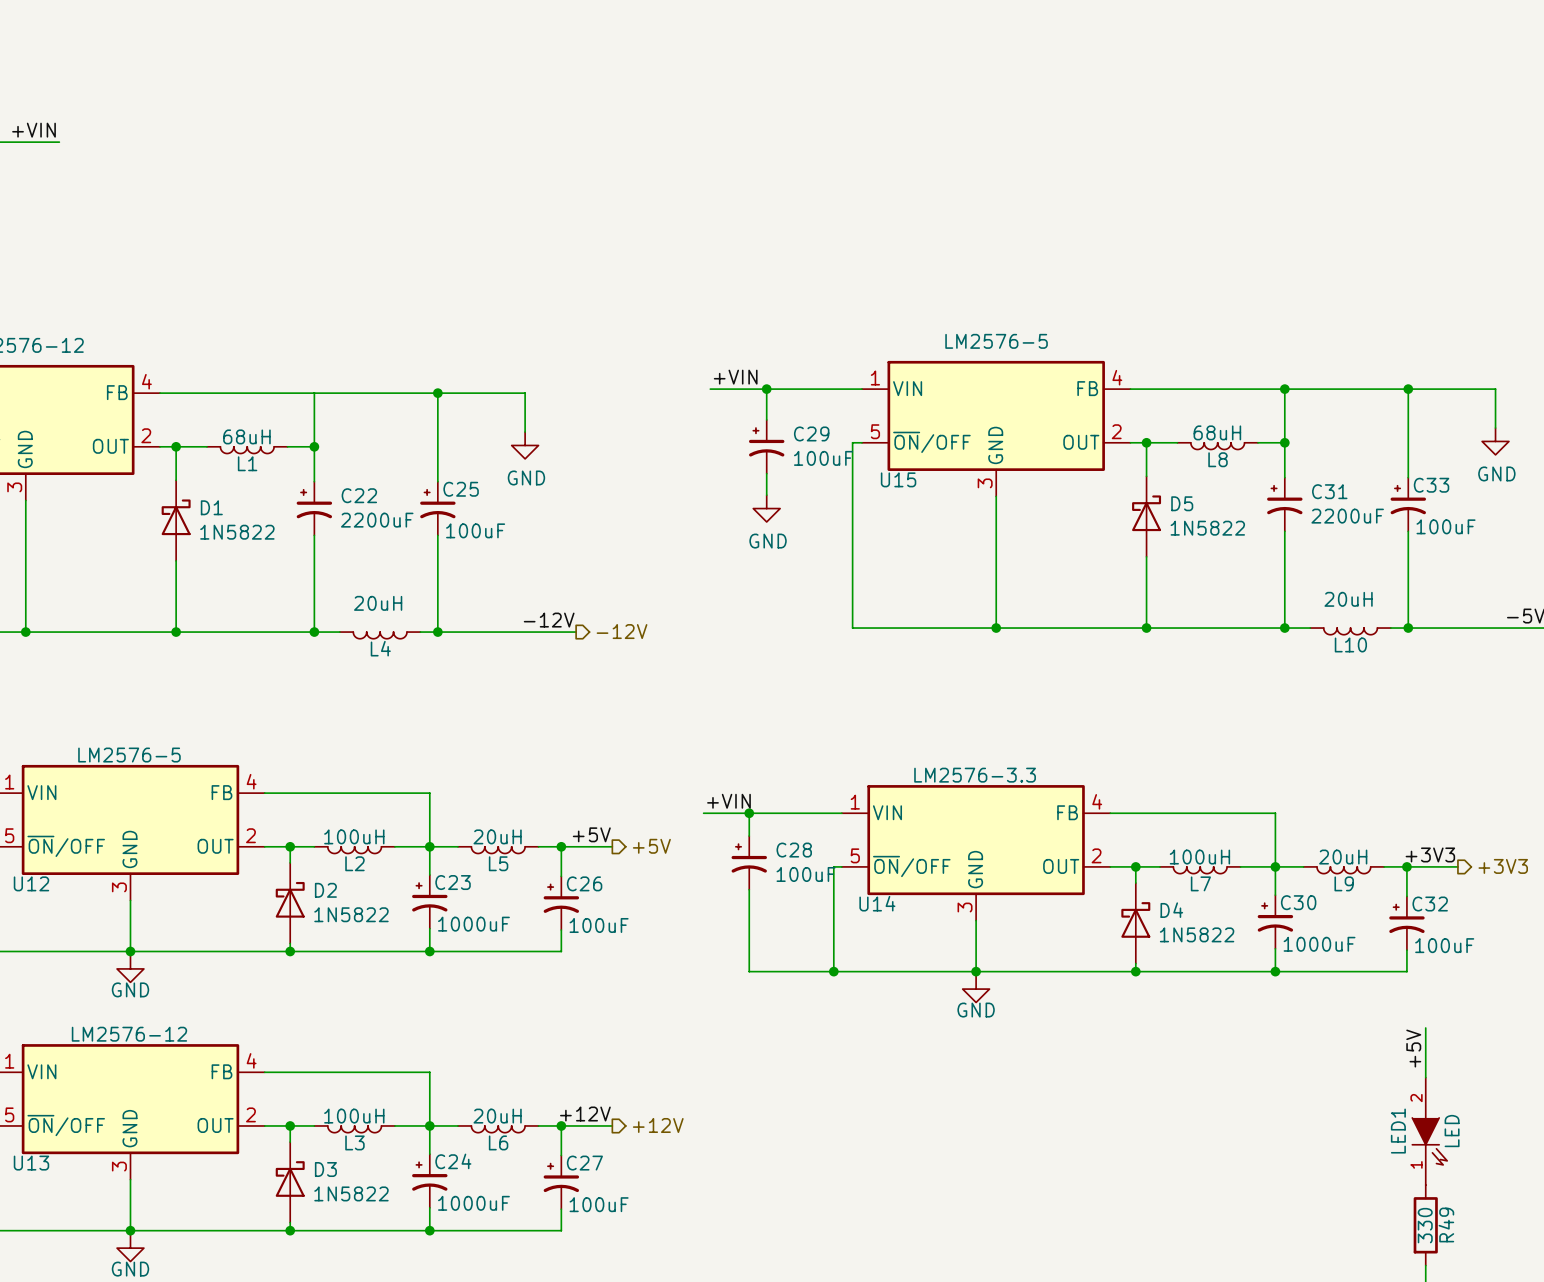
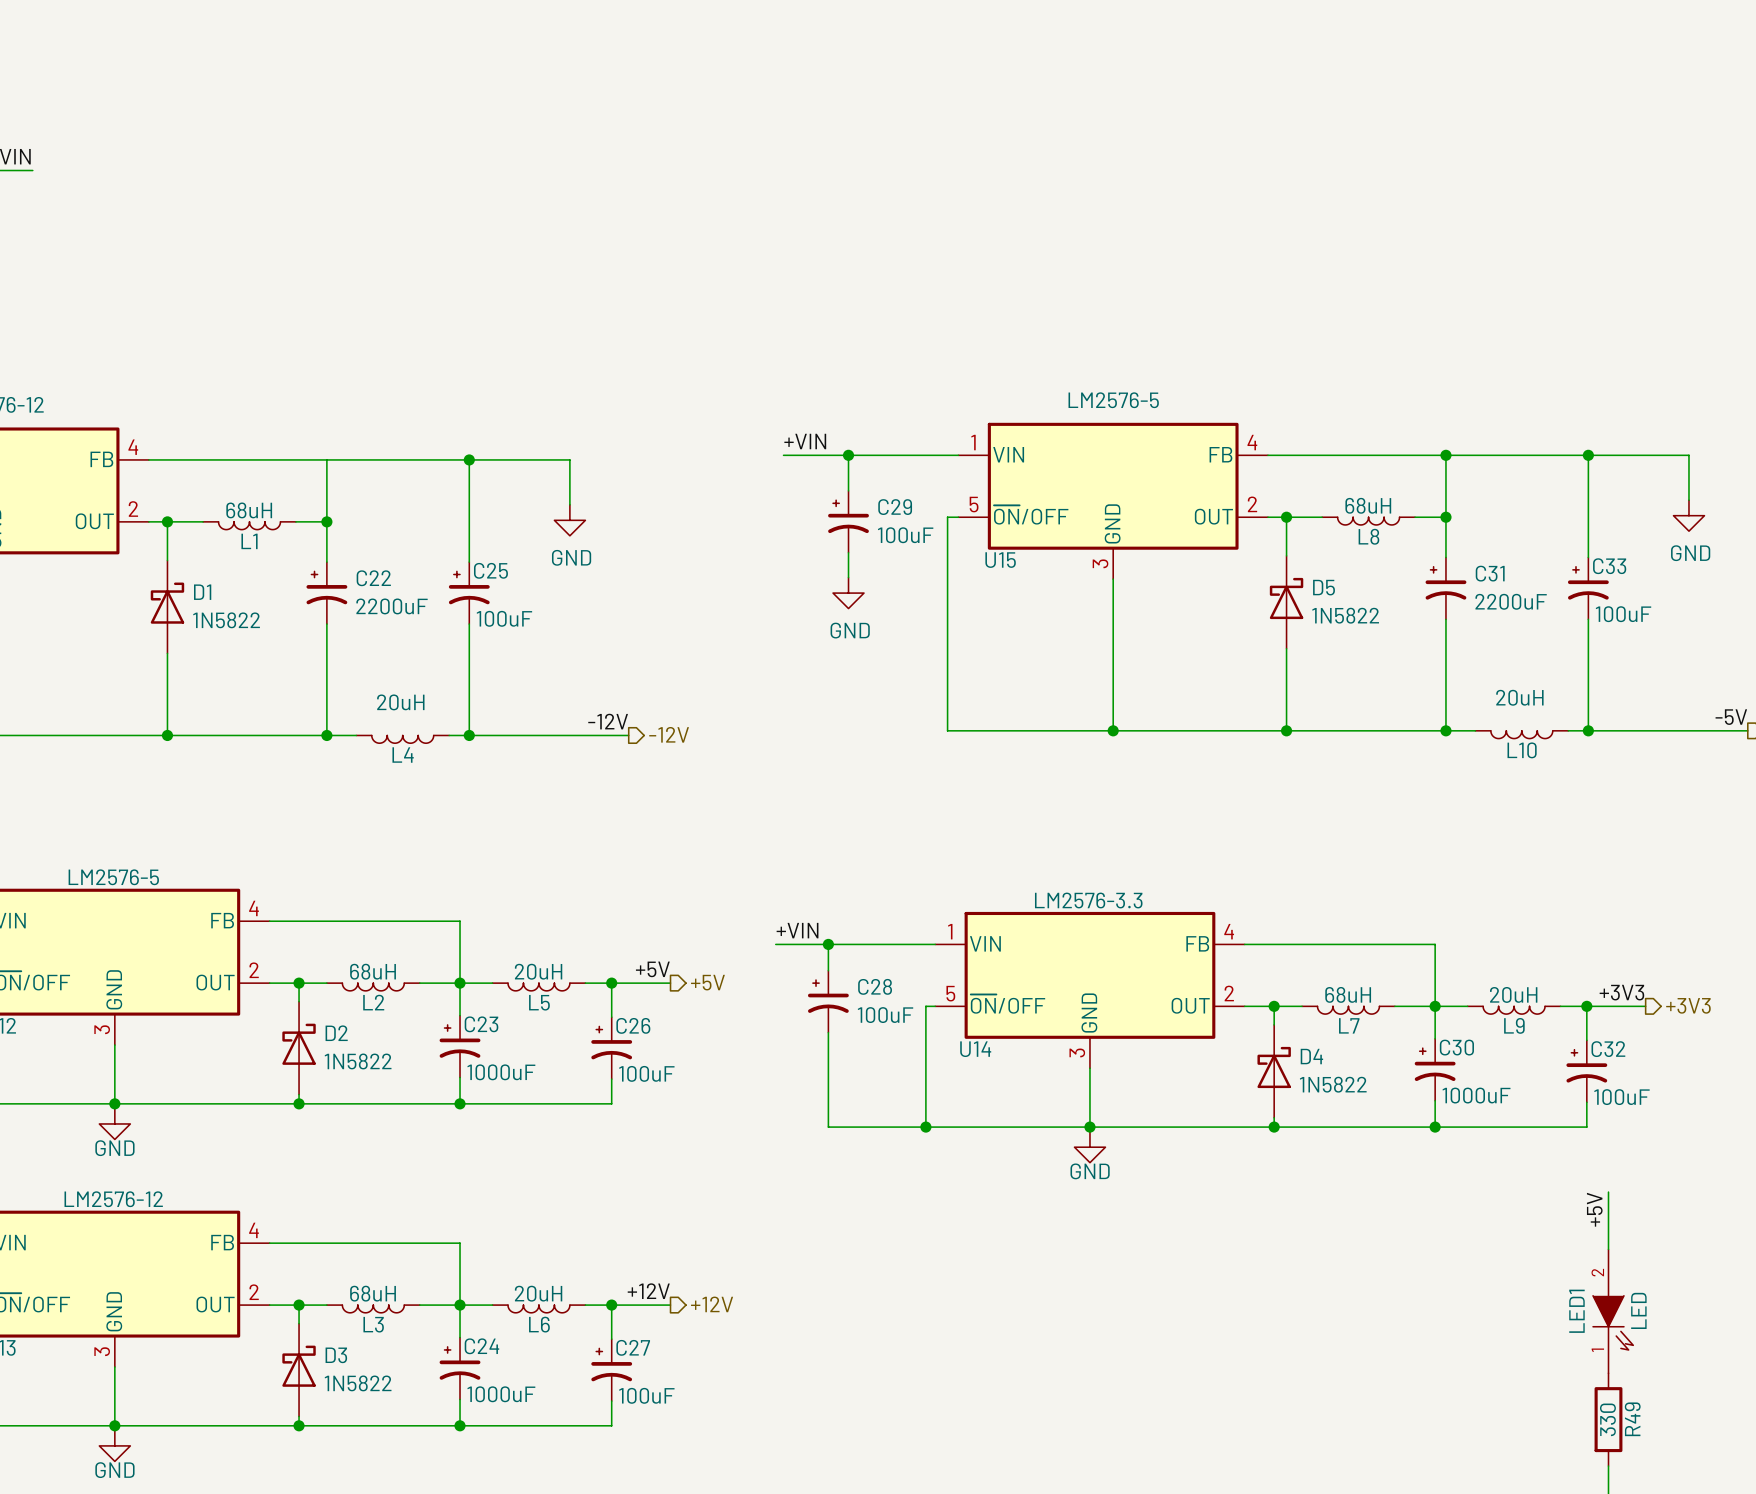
L2 value: 100uH (354, 836) -> 68uH (373, 971)
L7 value: 100uH (1199, 857) -> 68uH (1348, 994)
L3 value: 100uH (354, 1116) -> 68uH (373, 1293)

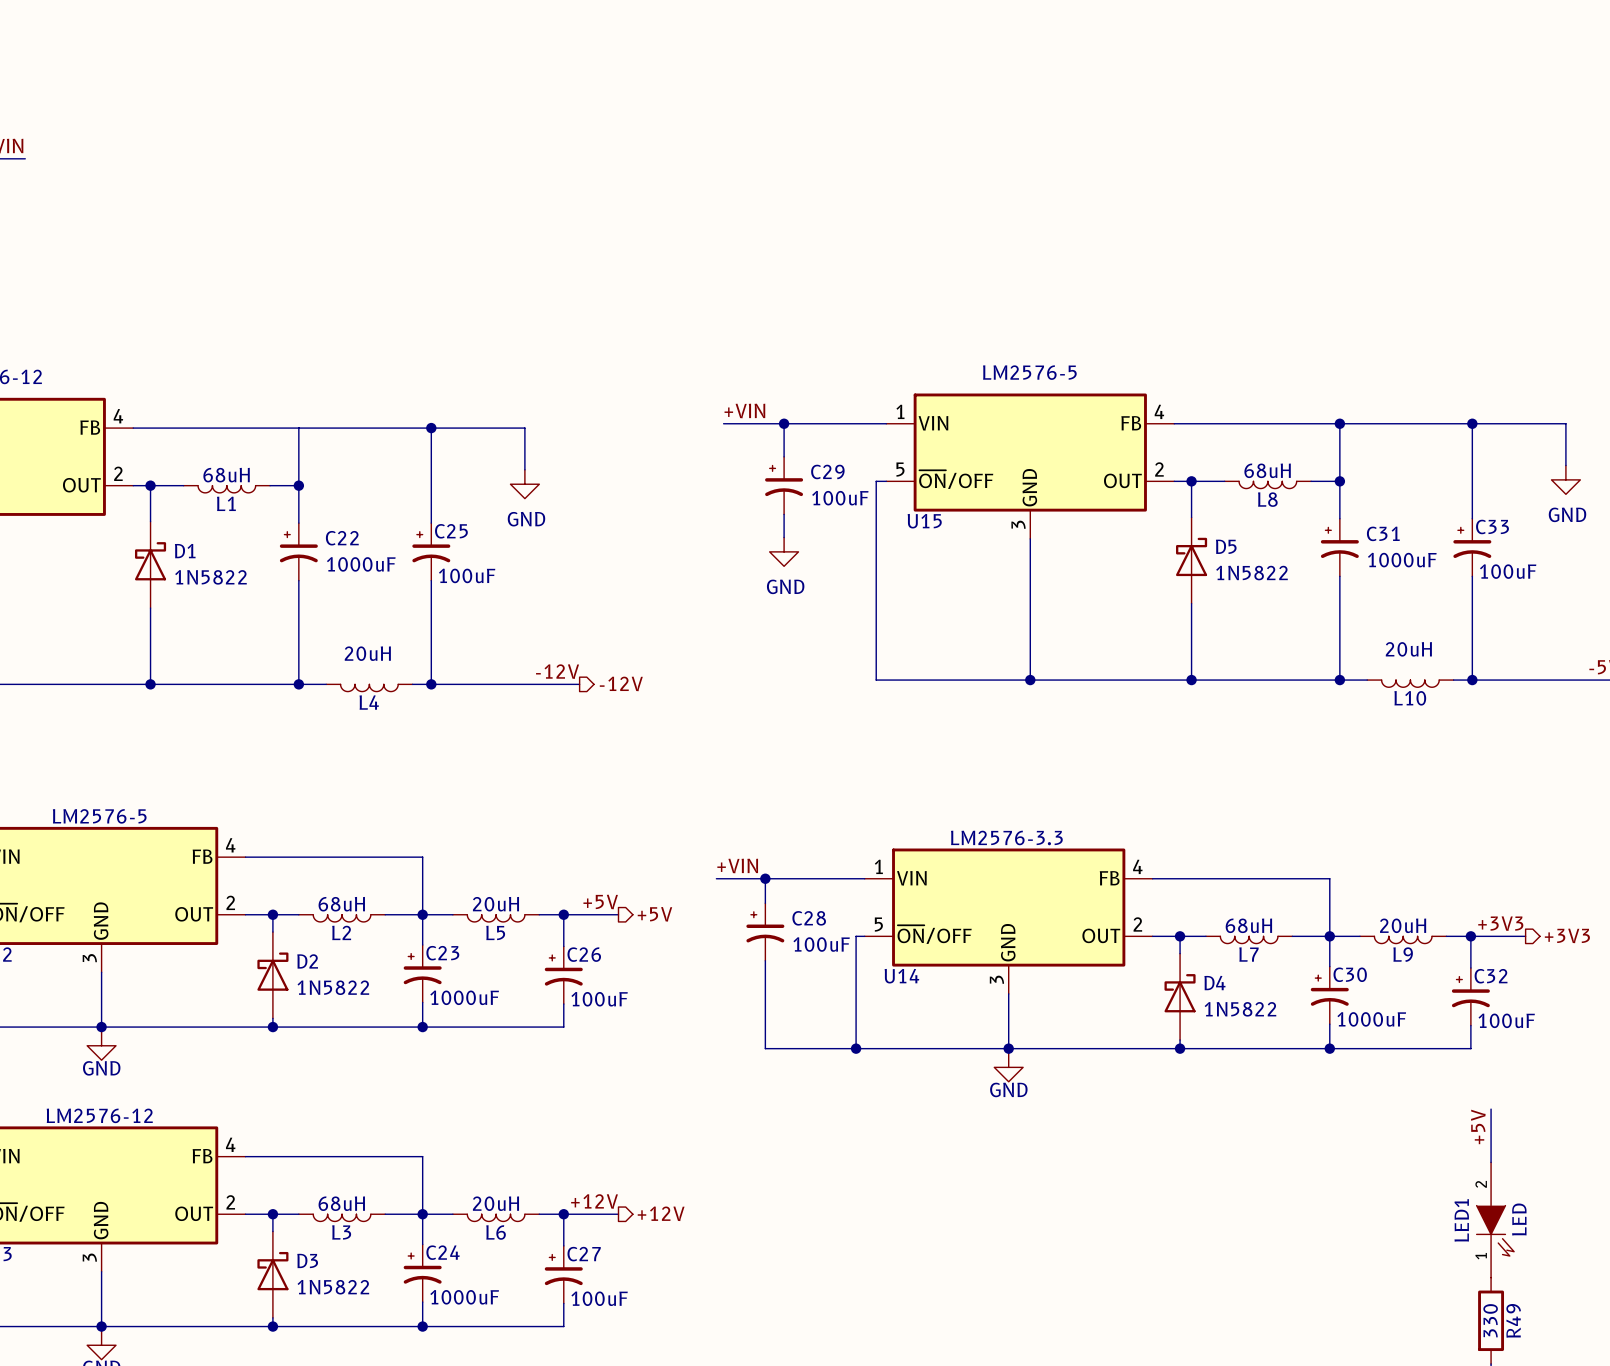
C31 value: 2200uF (1511, 601) -> 1000uF (1402, 560)
C22 value: 2200uF (392, 606) -> 1000uF (361, 564)

